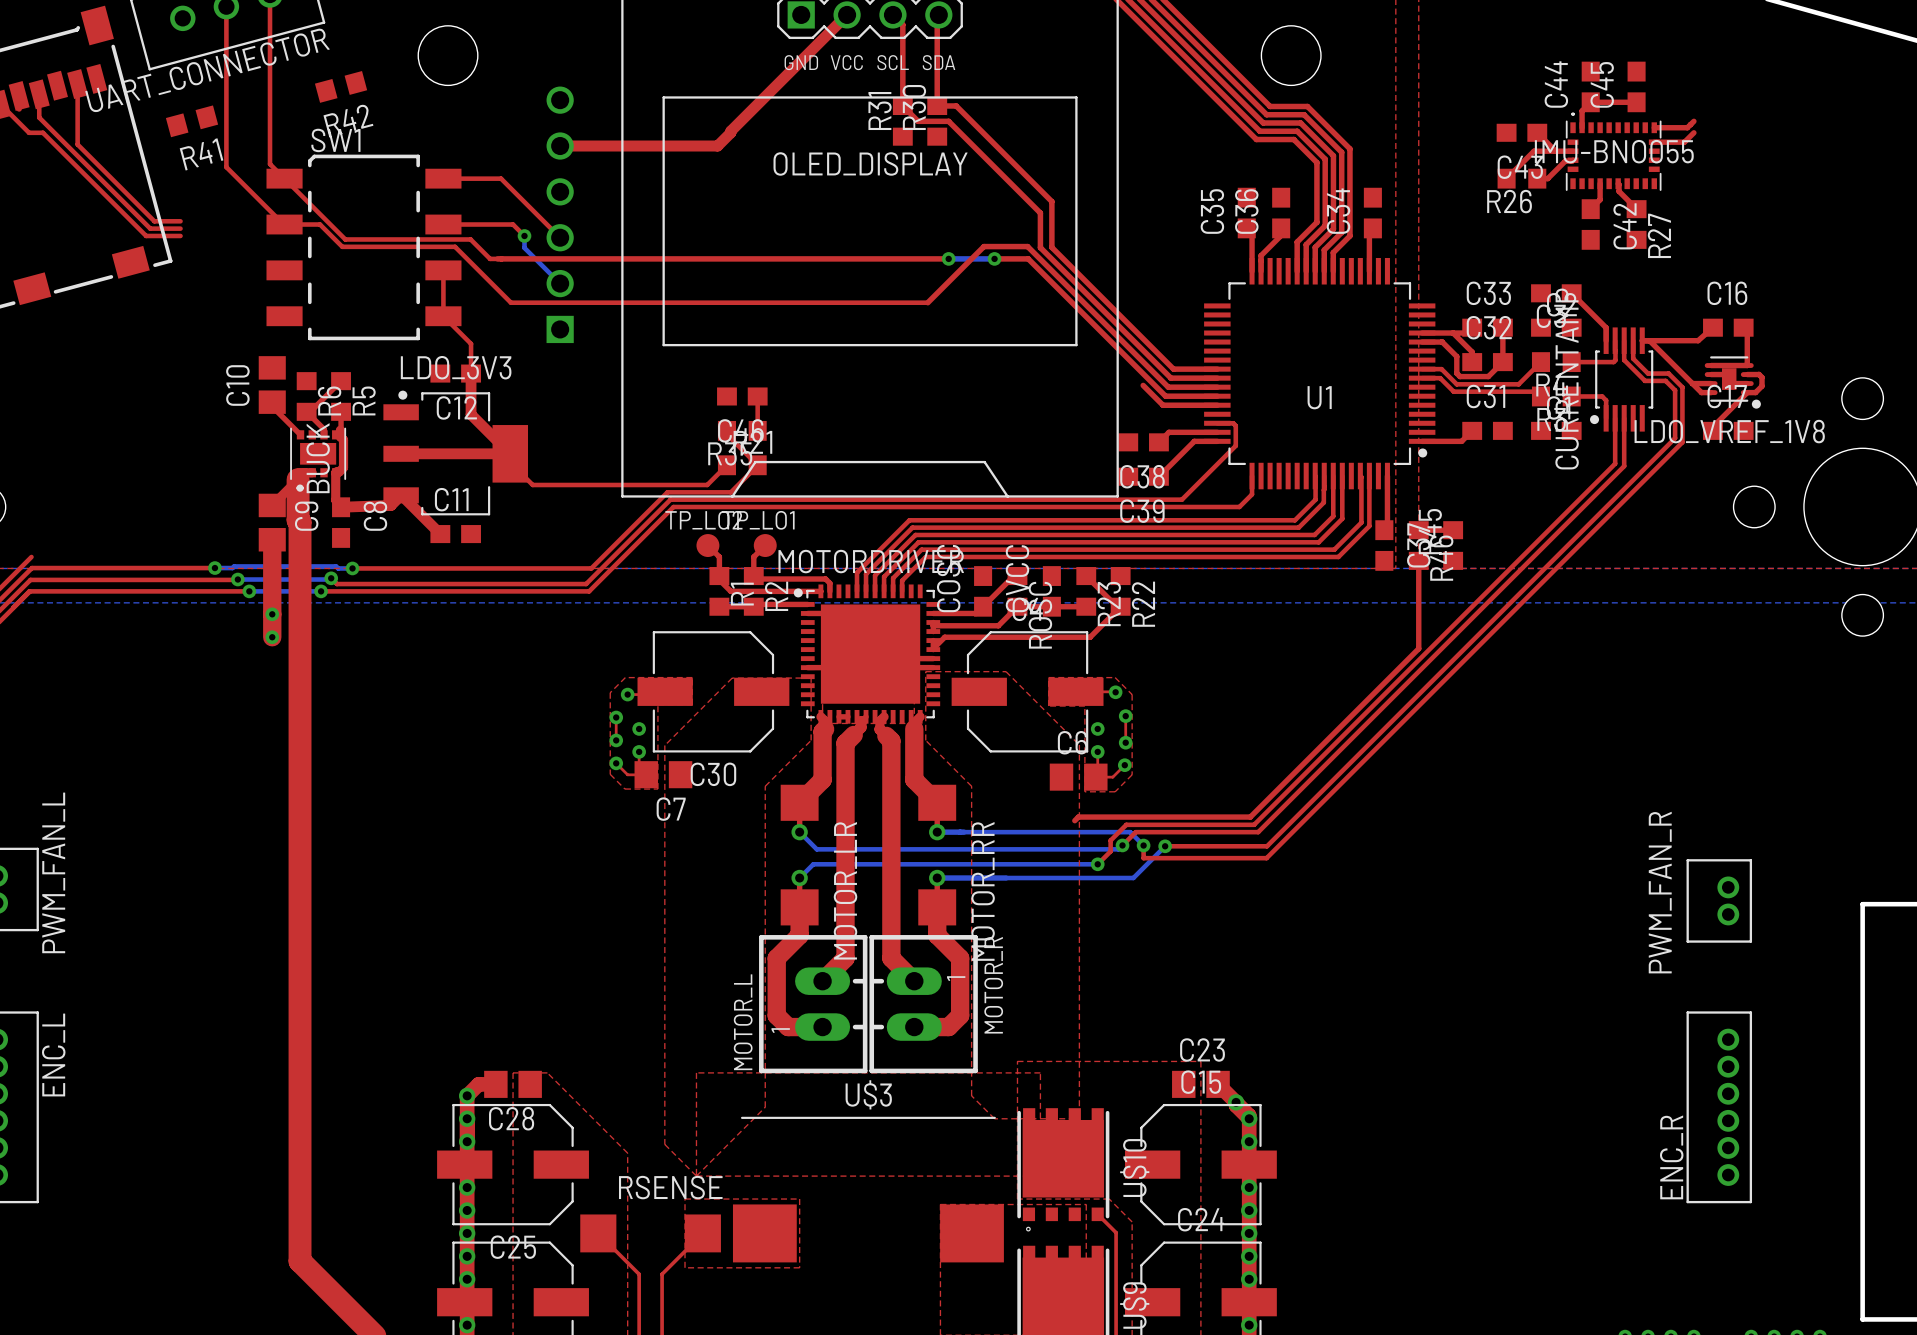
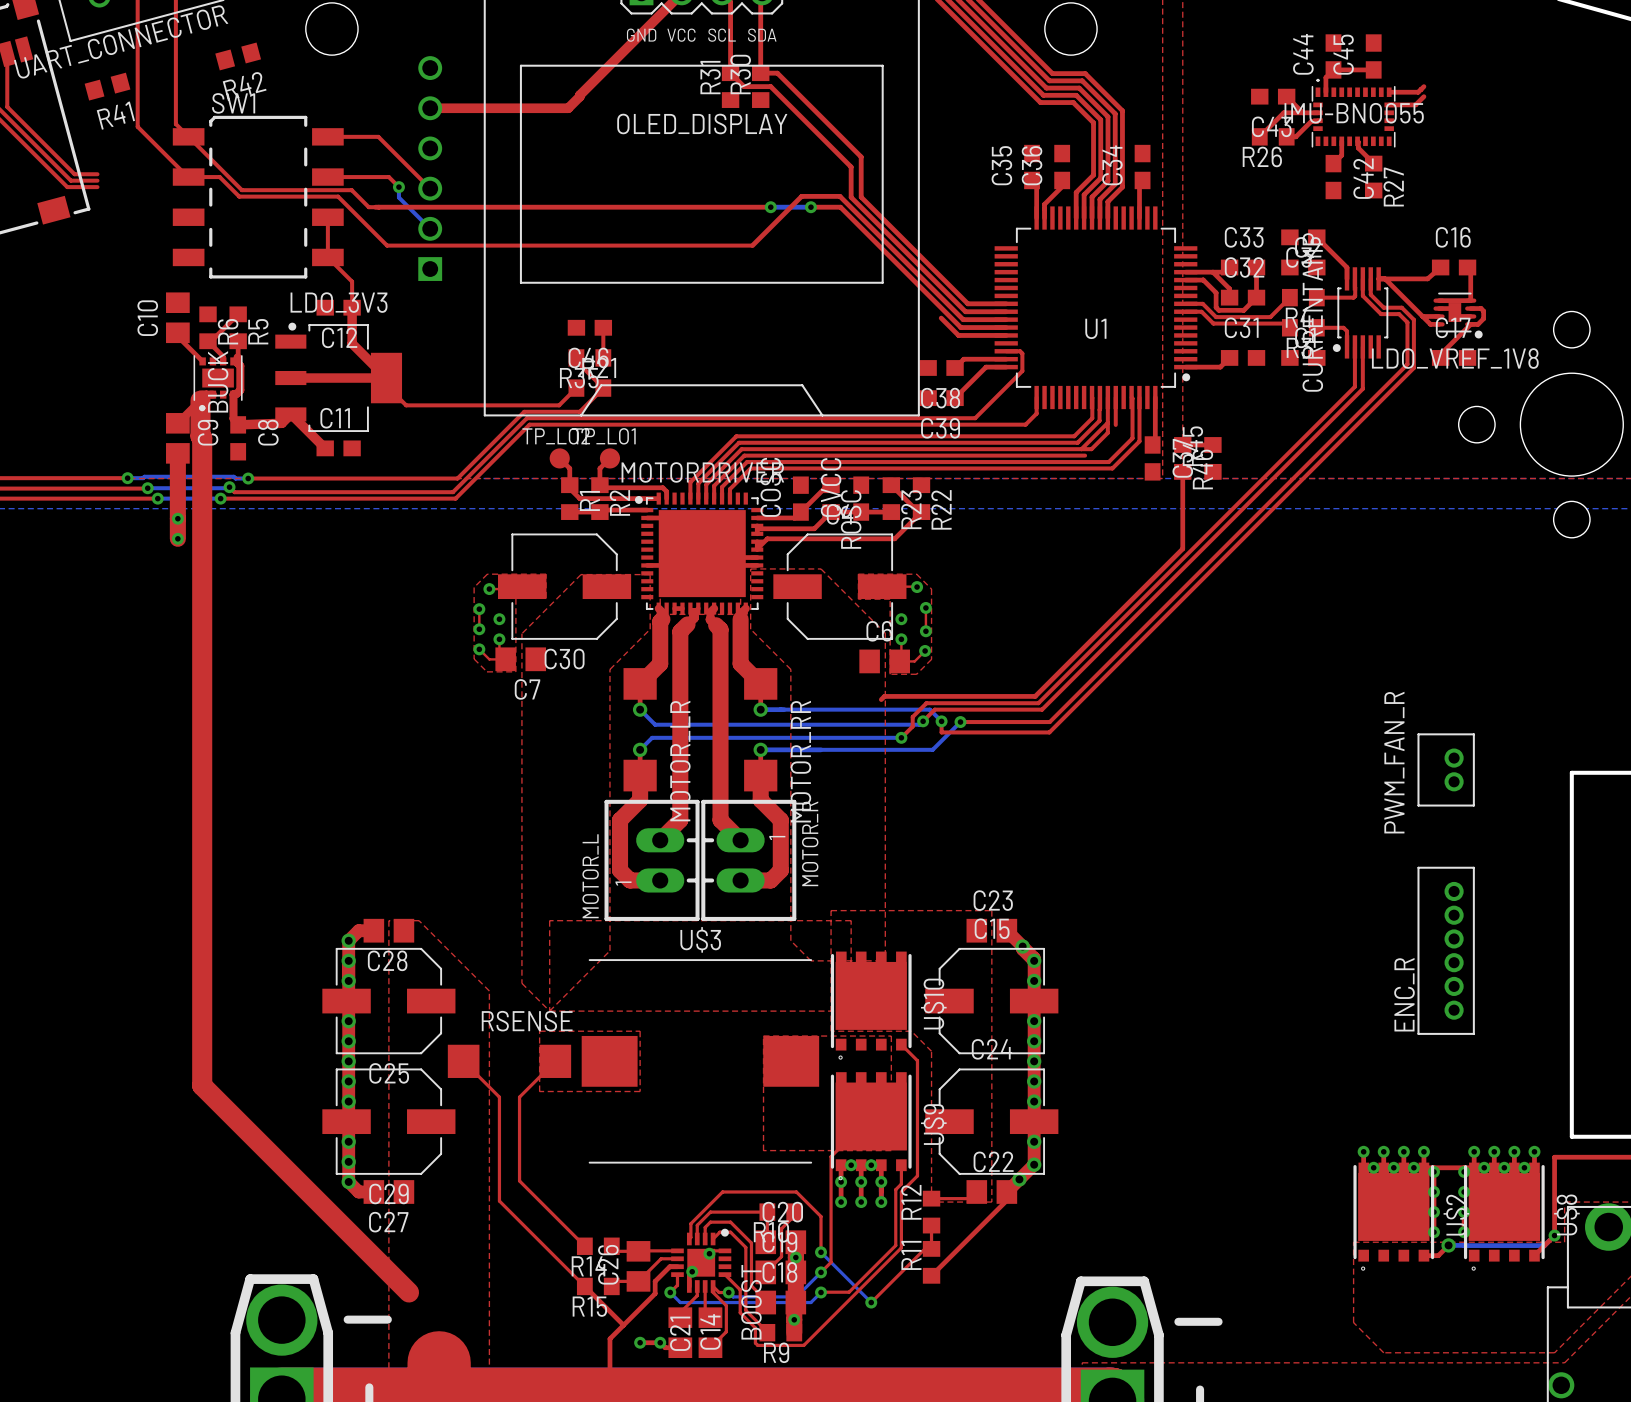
top track: none -> (1107, 422) (1081, 449)
top track: (1342, 507) (1342, 518) (1318, 542) (1307, 542) -> none

